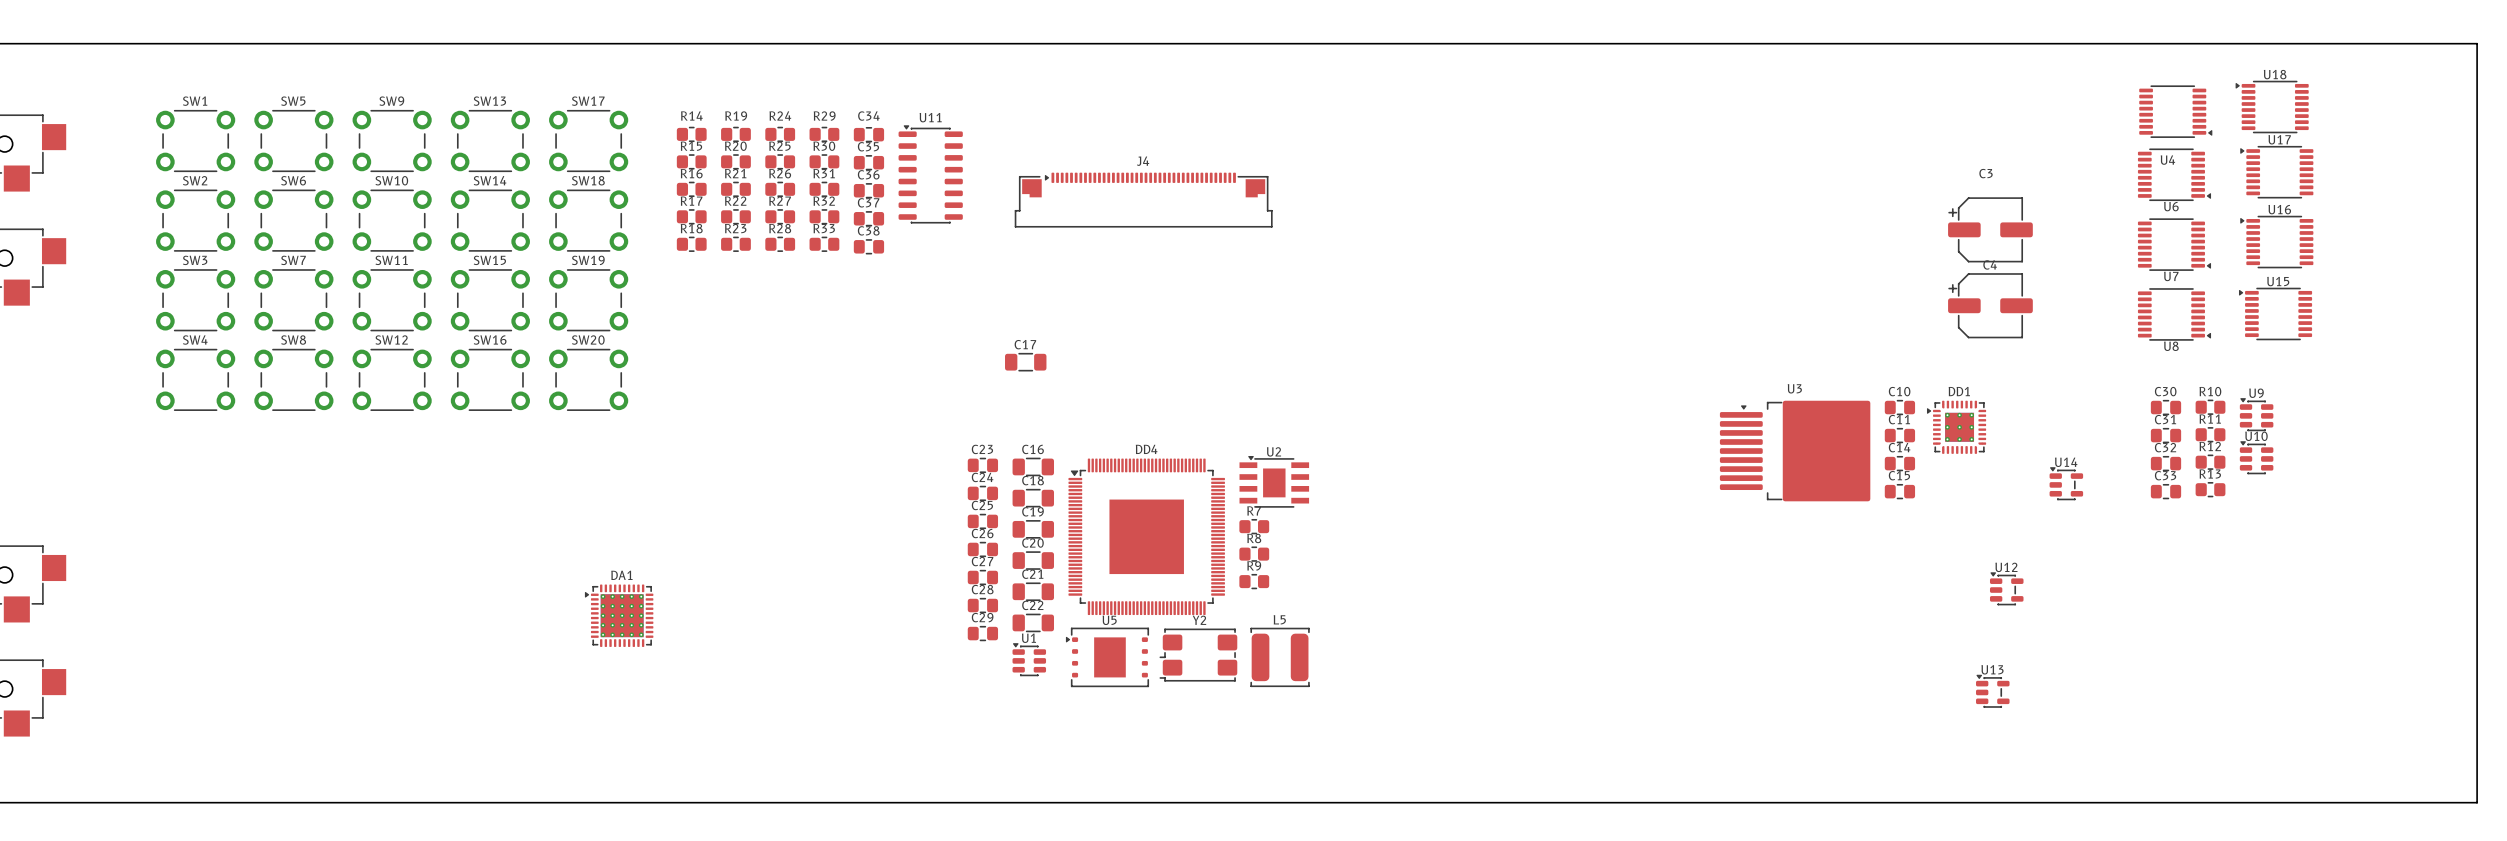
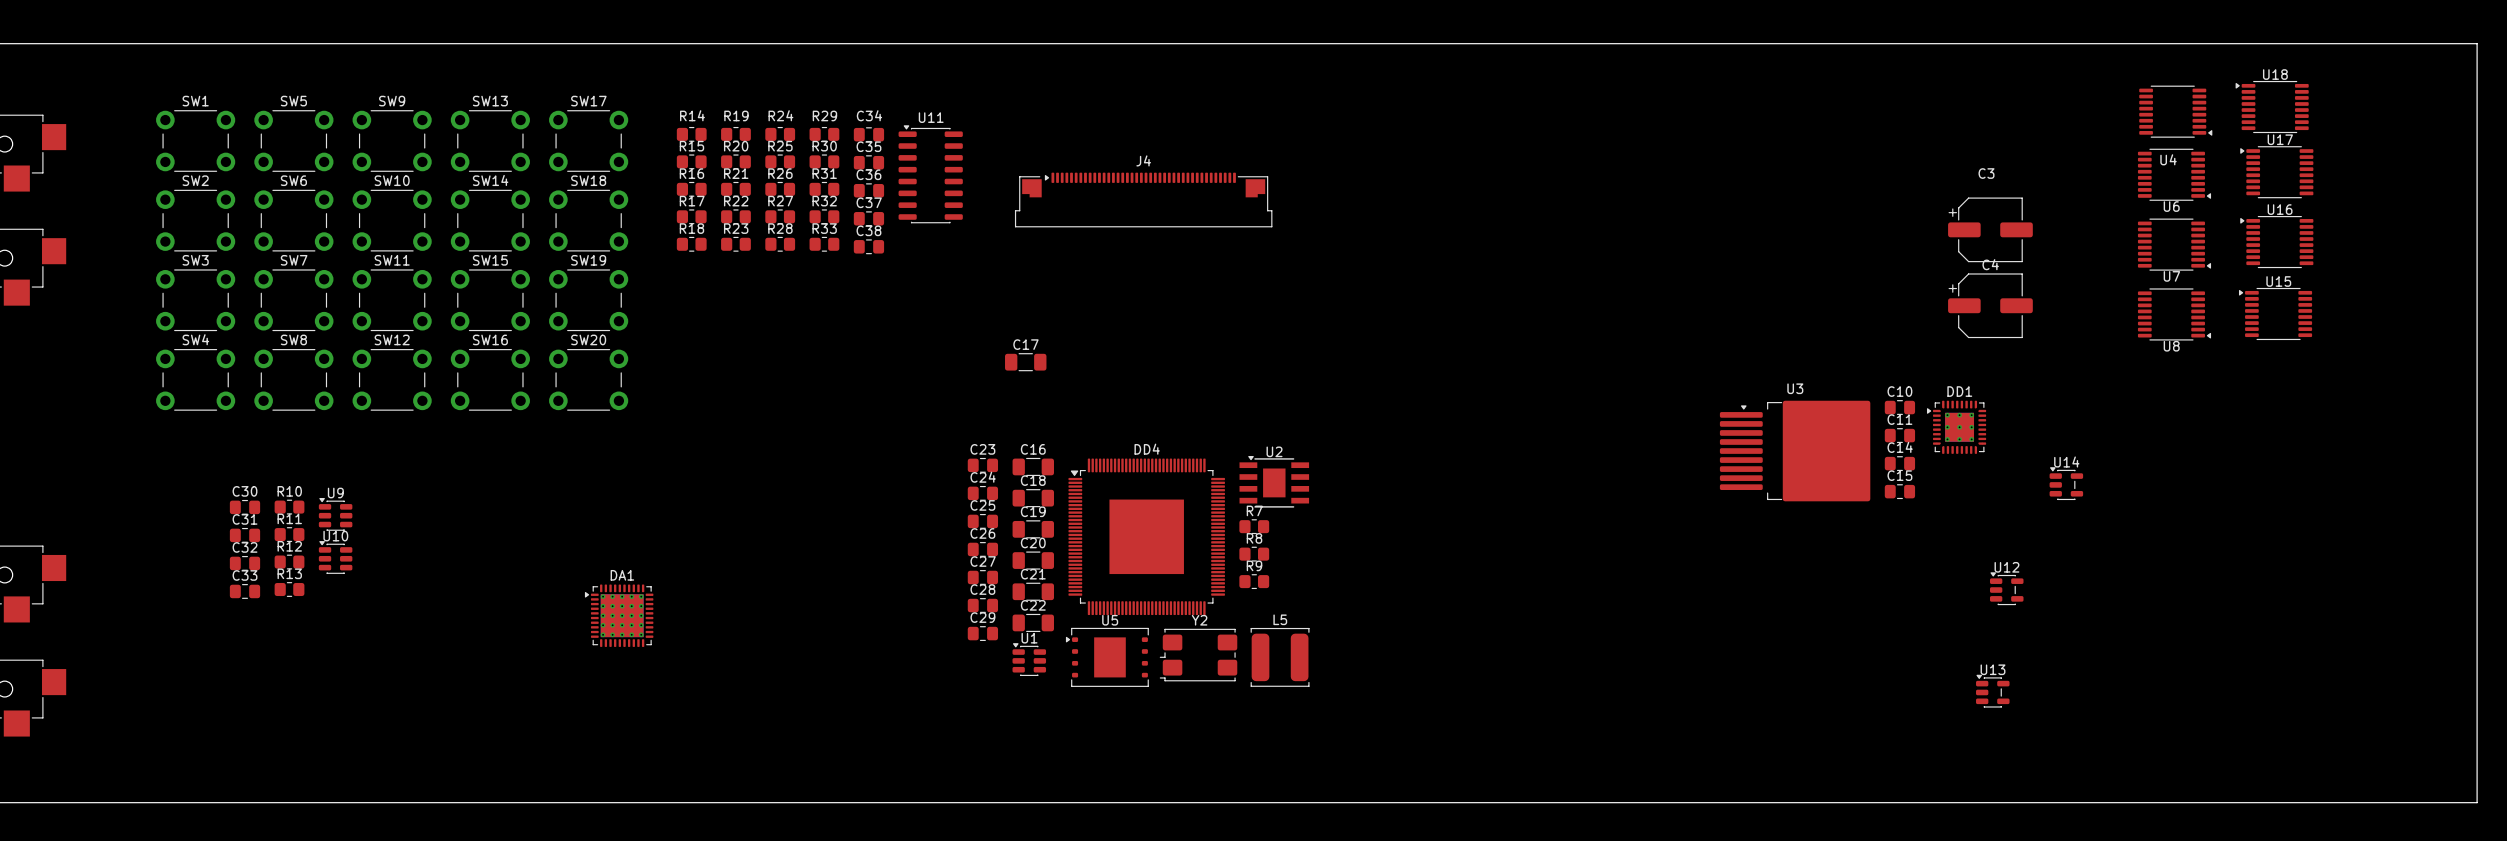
C30 position: (2165, 407) -> (244, 507)
R10 position: (2210, 407) -> (289, 507)
U9 position: (2256, 414) -> (335, 514)
R11 position: (2210, 434) -> (289, 534)
C31 position: (2165, 435) -> (244, 535)
U10 position: (2256, 457) -> (335, 557)
R12 position: (2210, 462) -> (289, 562)
C32 position: (2165, 463) -> (244, 563)
R13 position: (2210, 489) -> (289, 589)
C33 position: (2165, 491) -> (244, 591)

